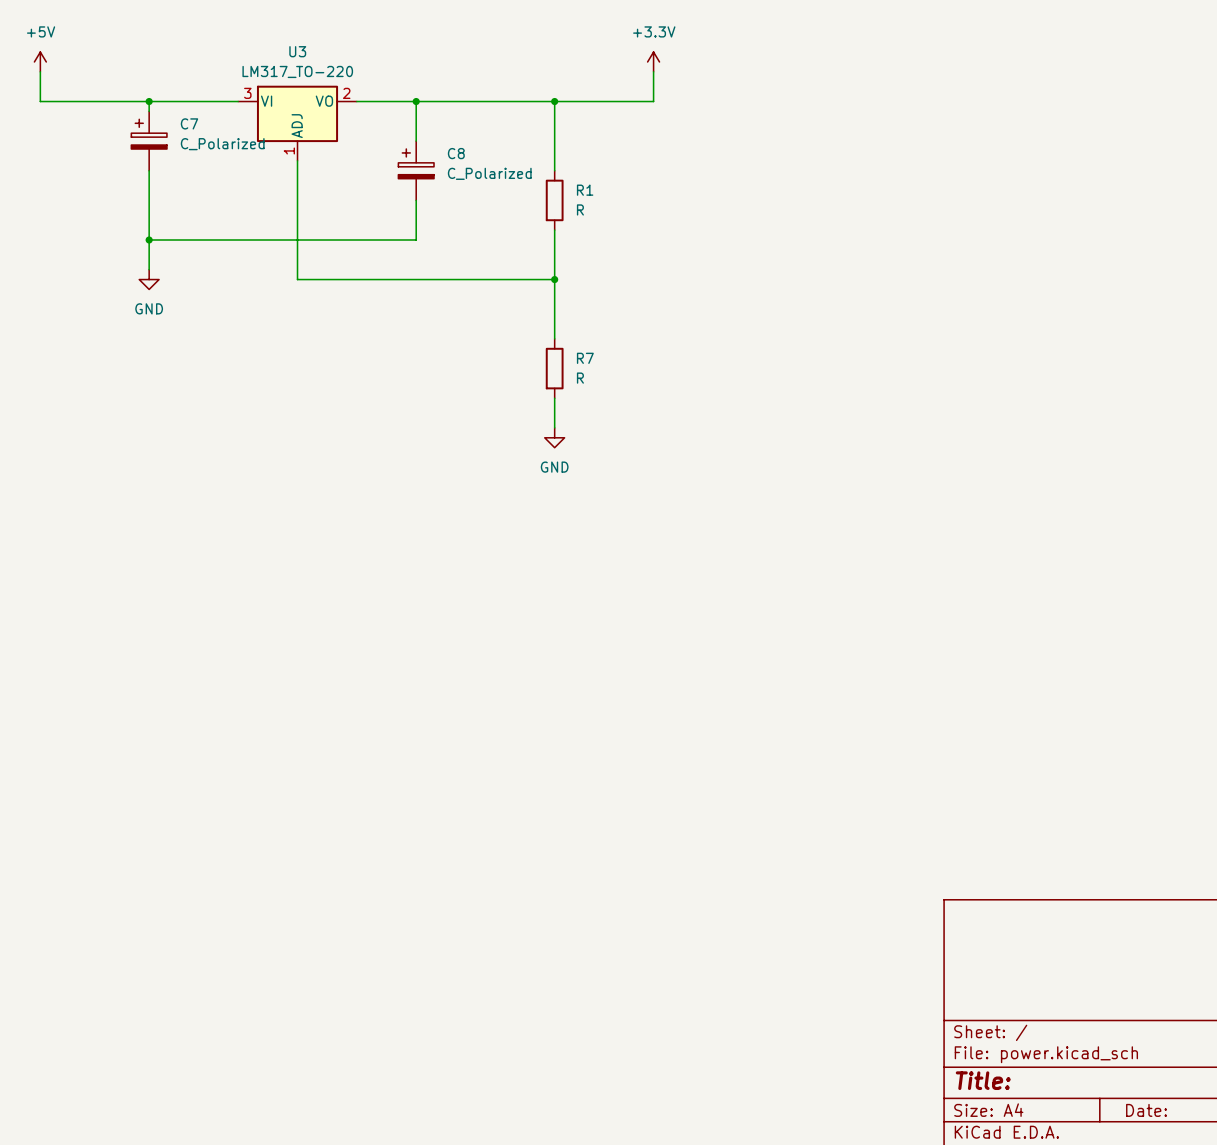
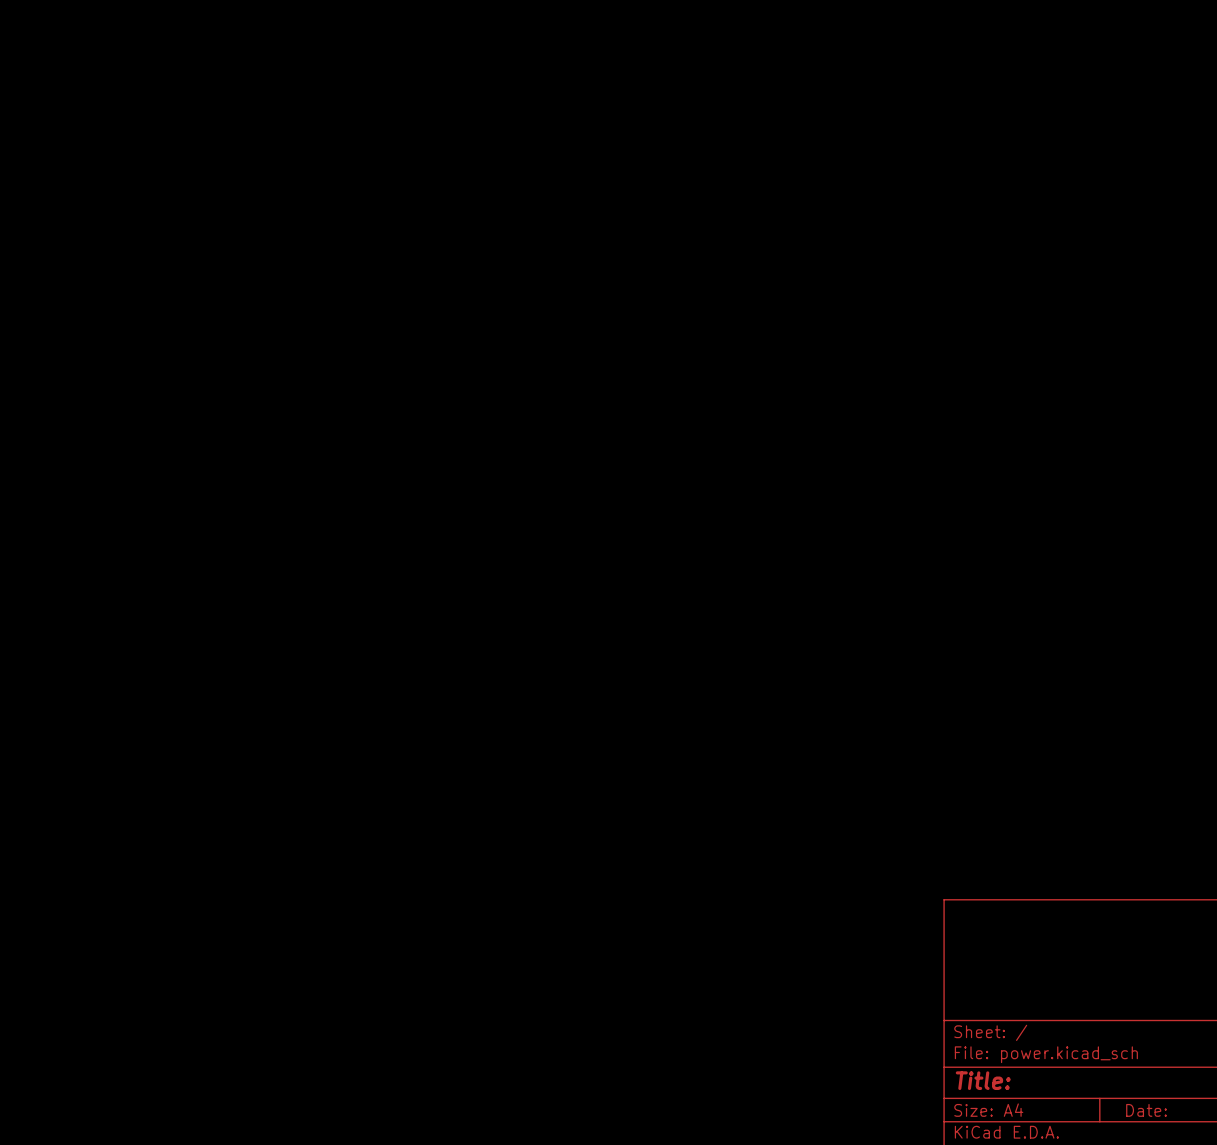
power symbol: +5V (40, 61) -> none
power symbol: +3.3V (653, 61) -> none
wire: (40, 71) (40, 101) (238, 101) -> none
wire: (653, 71) (653, 101) (356, 101) -> none
wire: (149, 101) (149, 111) -> none
junction: (149, 101) -> none
wire: (416, 101) (416, 141) -> none
junction: (416, 101) -> none
wire: (554, 101) (554, 170) -> none
junction: (554, 101) -> none
U3: LM317_TO-220 (297, 123) -> none
C7: C_Polarized (149, 141) -> none
wire: (297, 160) (297, 279) (554, 279) -> none
wire: (149, 170) (149, 269) -> none
C8: C_Polarized (416, 170) -> none
wire: (416, 200) (416, 240) (149, 240) -> none
R1: R (554, 200) -> none
wire: (554, 230) (554, 338) -> none
junction: (149, 240) -> none
power symbol: GND (149, 279) -> none
junction: (554, 279) -> none
R7: R (554, 368) -> none
wire: (554, 398) (554, 427) -> none
power symbol: GND (554, 437) -> none

